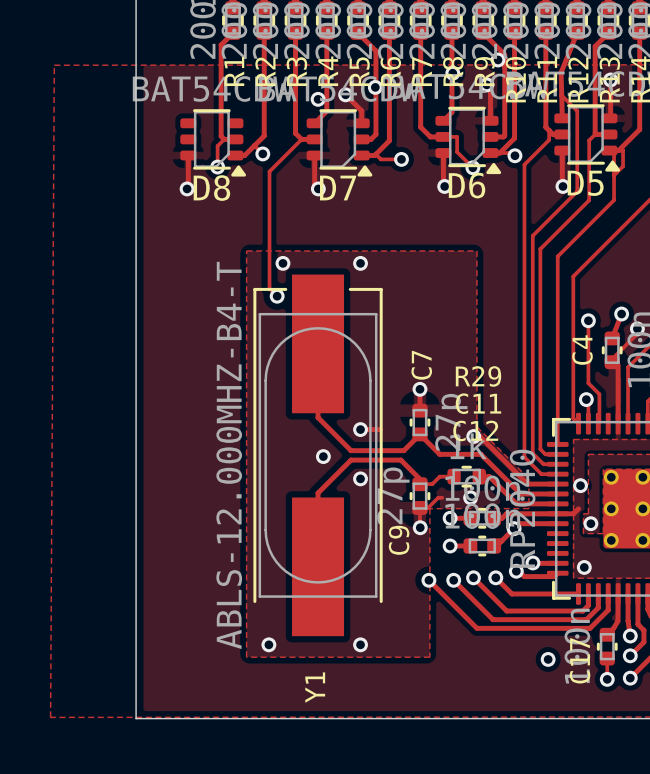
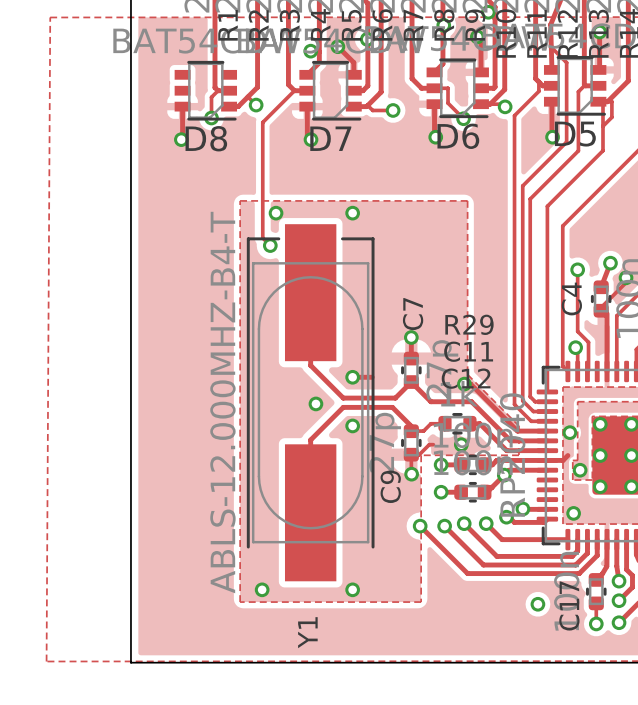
D5 footprint: [554, 104, 621, 172] -> [543, 55, 607, 116]
D6 footprint: [435, 106, 502, 175] -> [426, 58, 489, 119]
D8 footprint: [180, 109, 247, 177] -> [174, 60, 238, 121]
D7 footprint: [306, 109, 373, 177] -> [299, 60, 362, 121]

